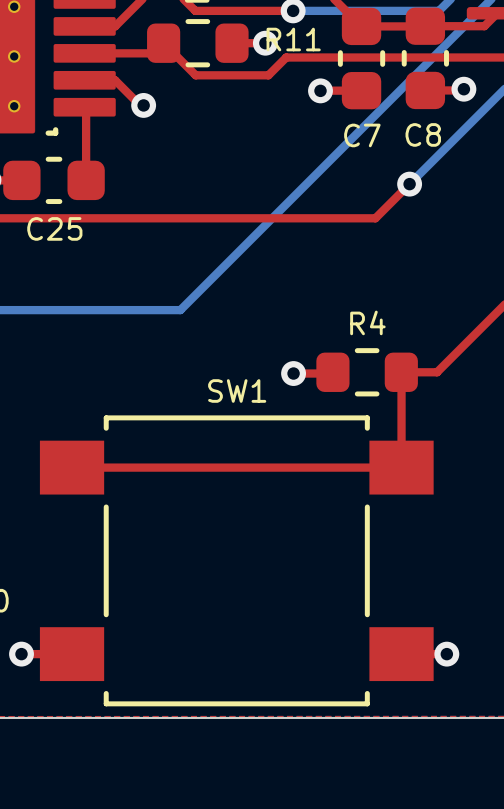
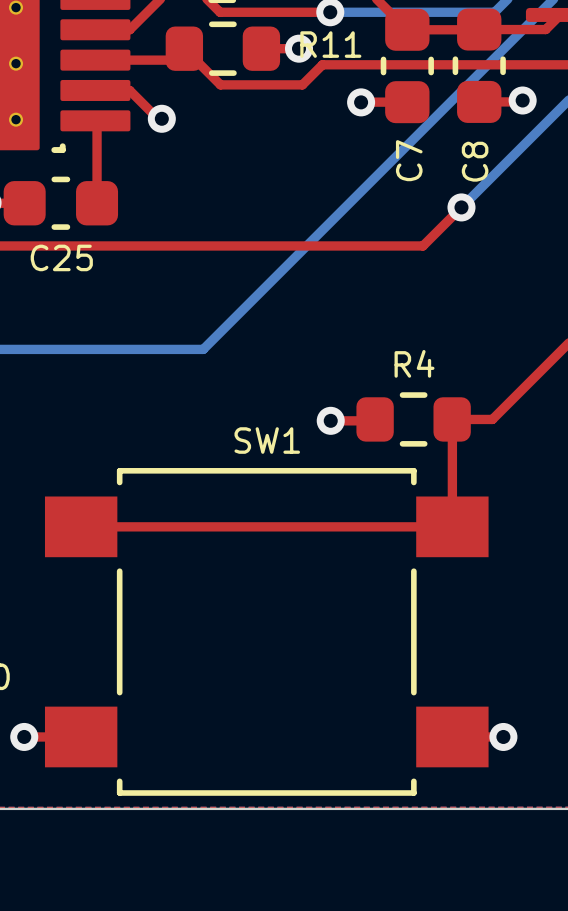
C8 name rotation: 0° (423, 134) -> 90° counterclockwise (475, 161)
C7 name rotation: 0° (362, 135) -> 90° counterclockwise (409, 160)

